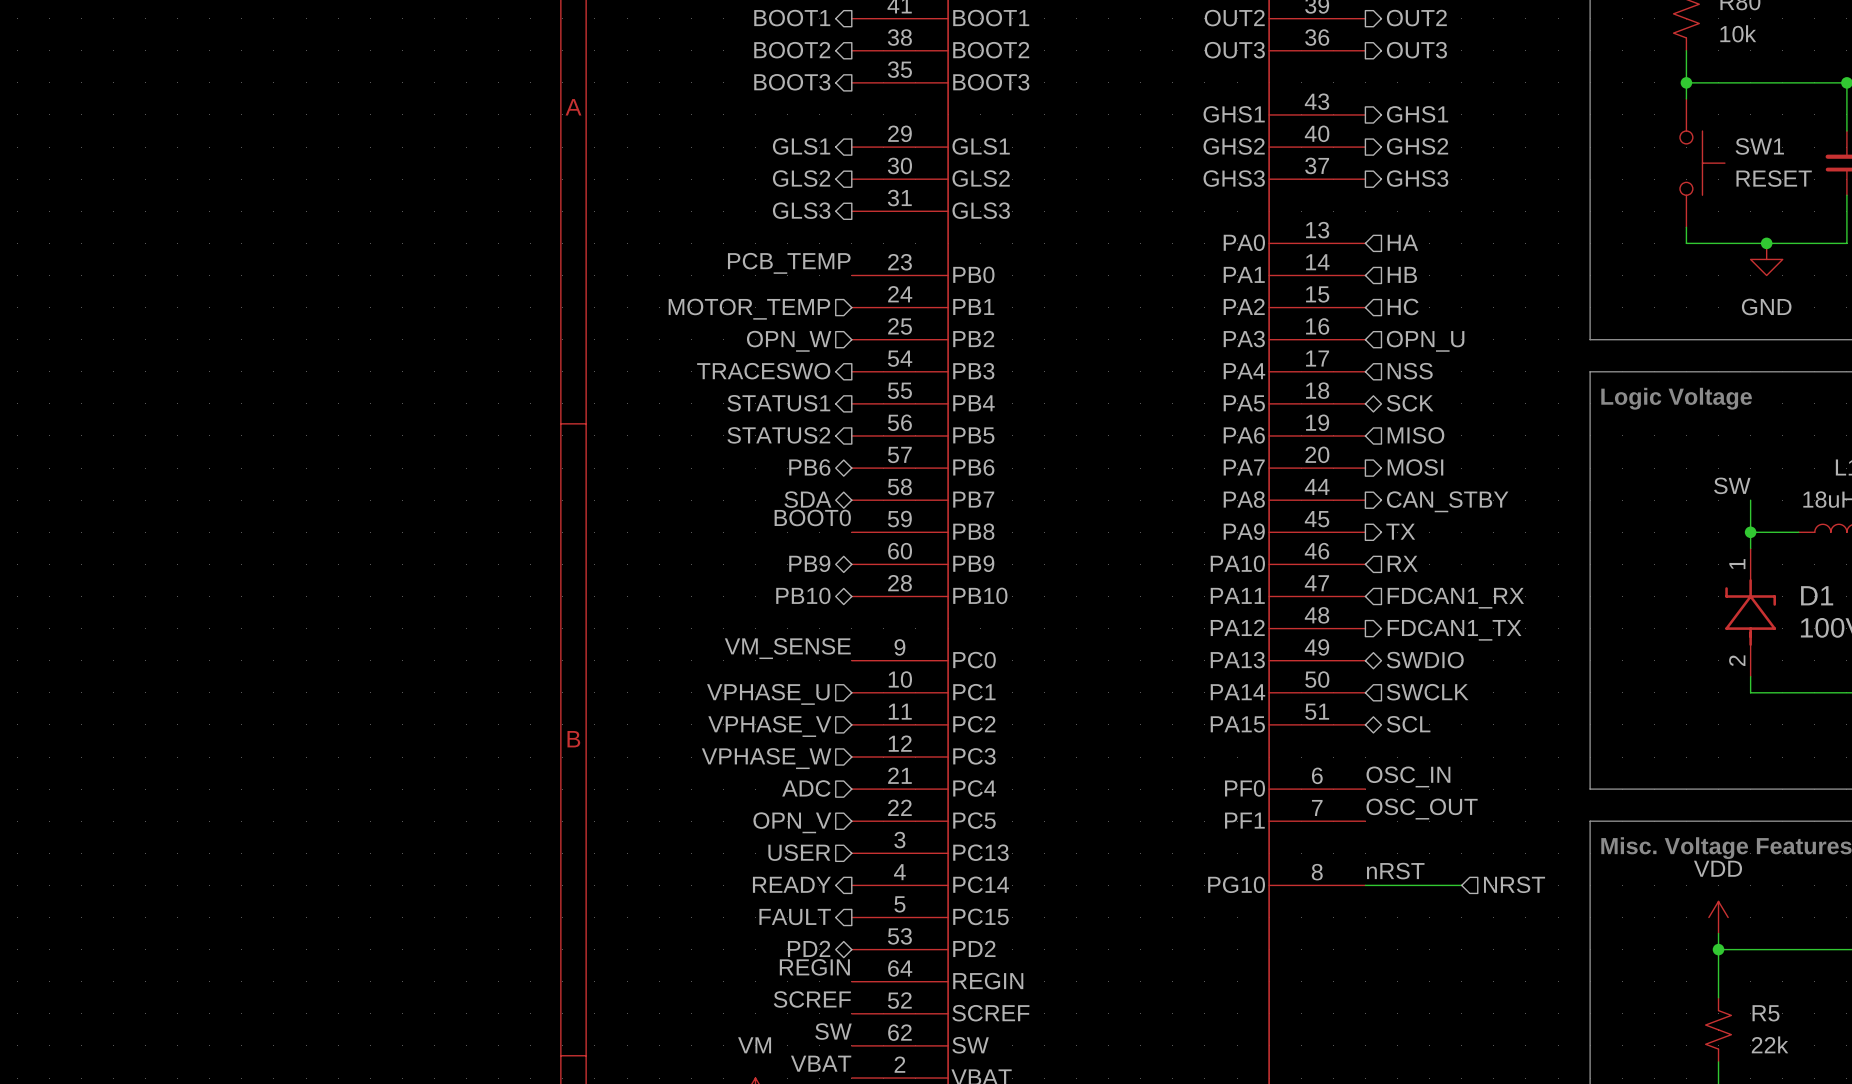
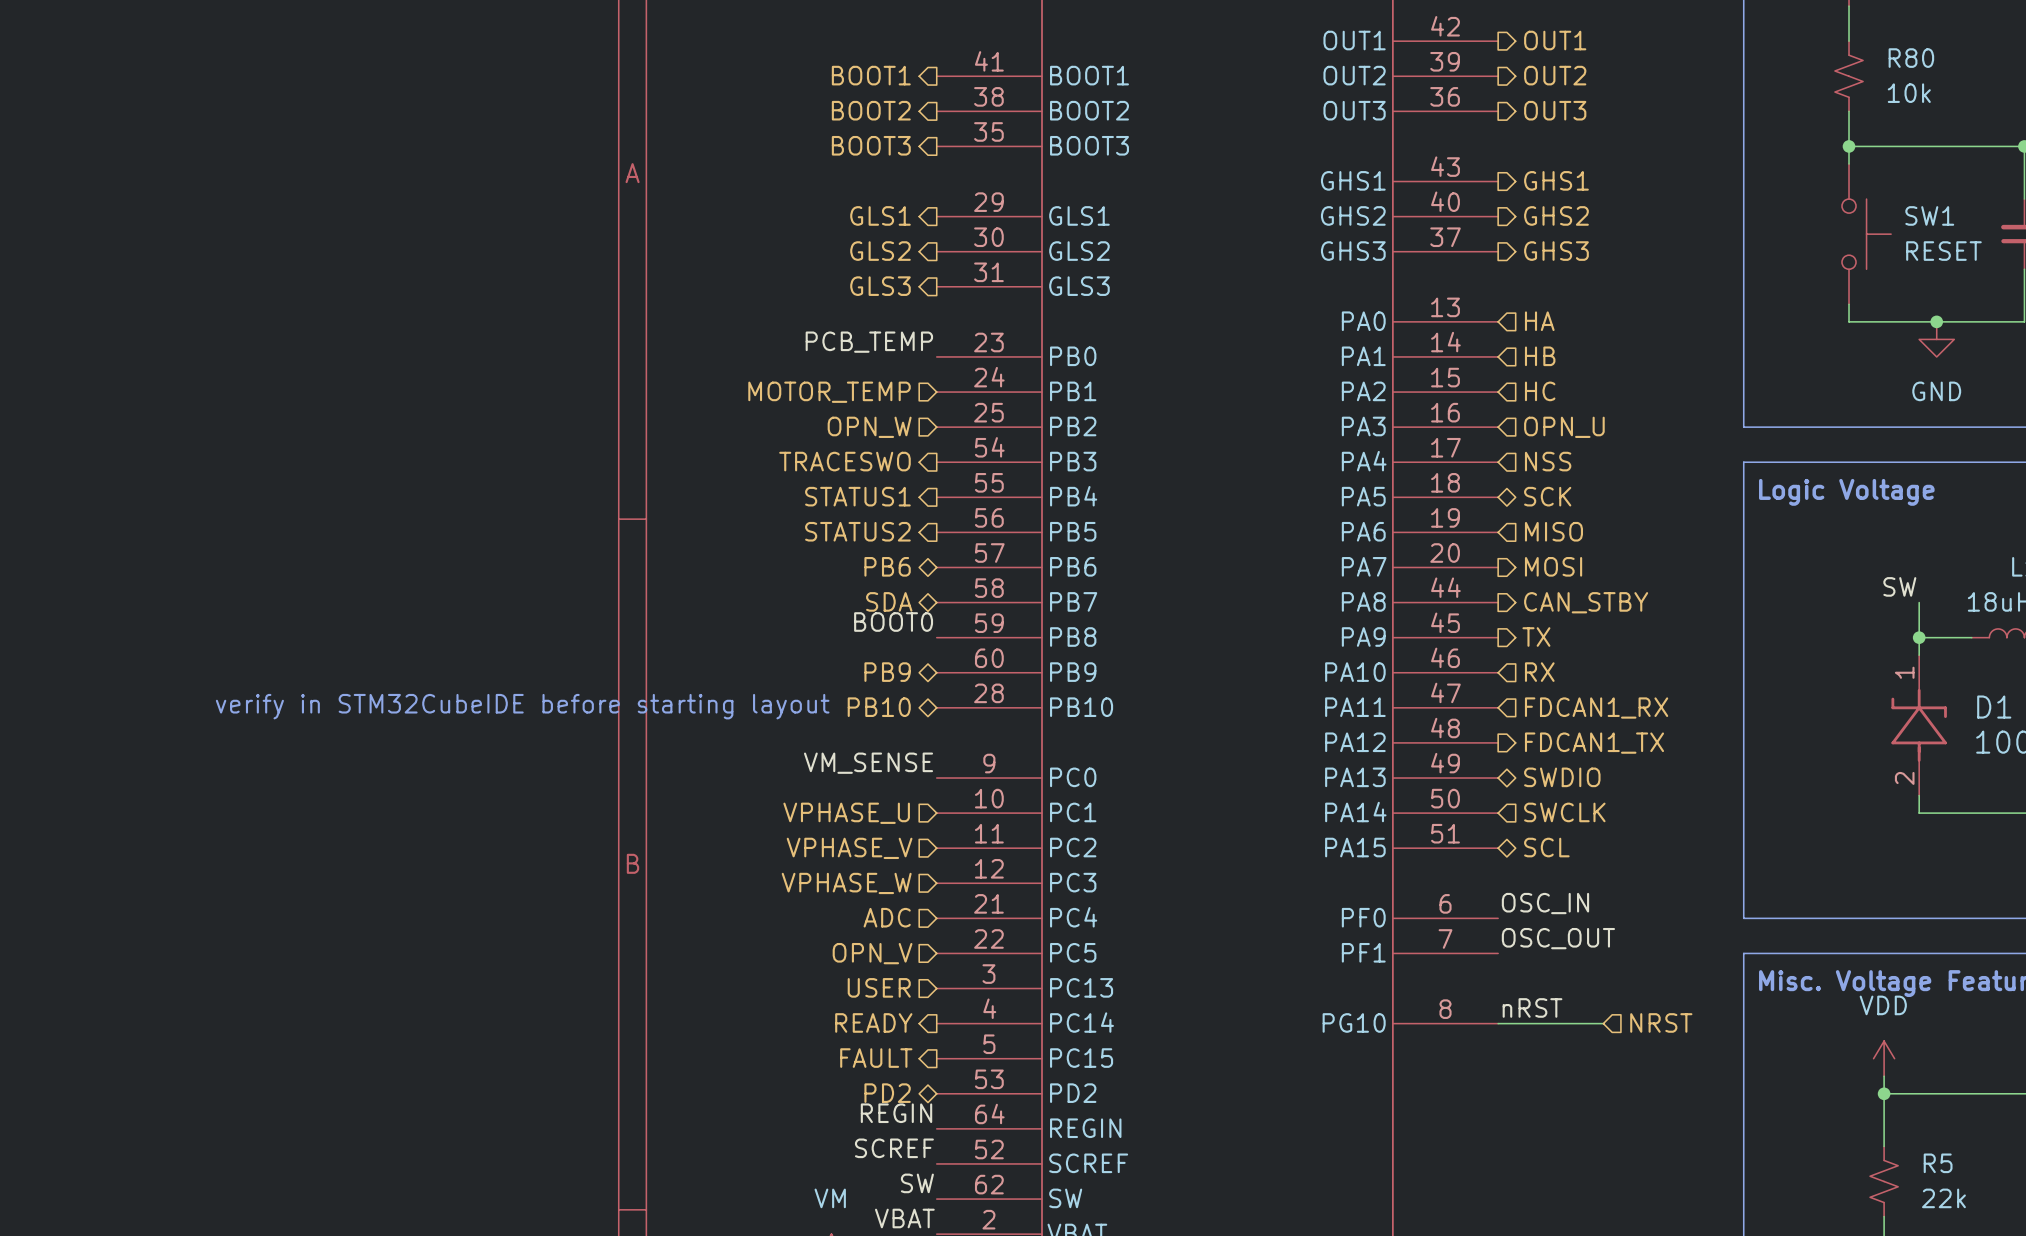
text: none -> verify in STM32CubeIDE before starting layout (522, 706)

